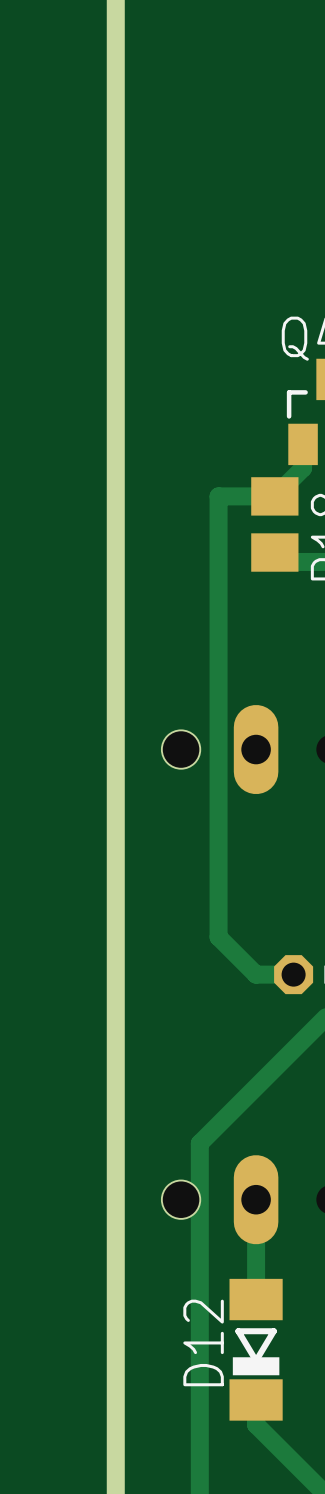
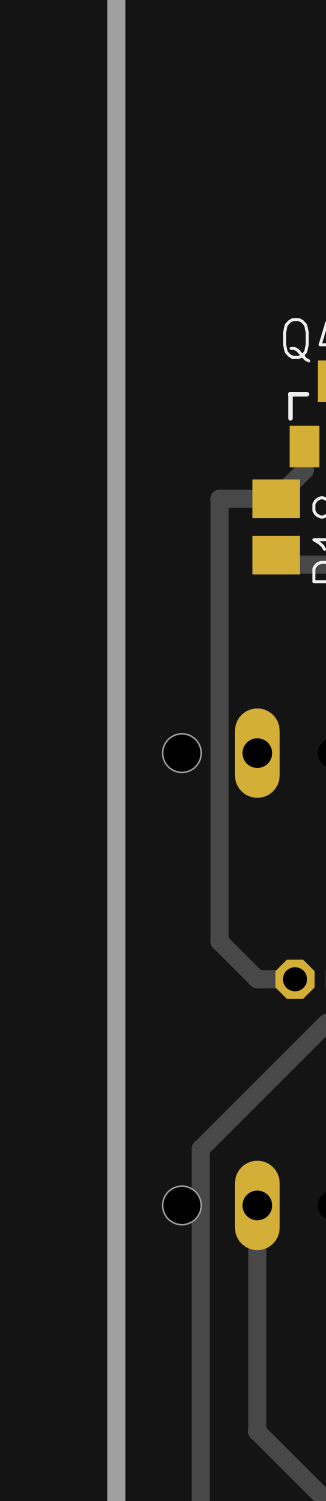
track: none -> (257, 1305) (257, 1406)
D12: (256, 1349) -> none

